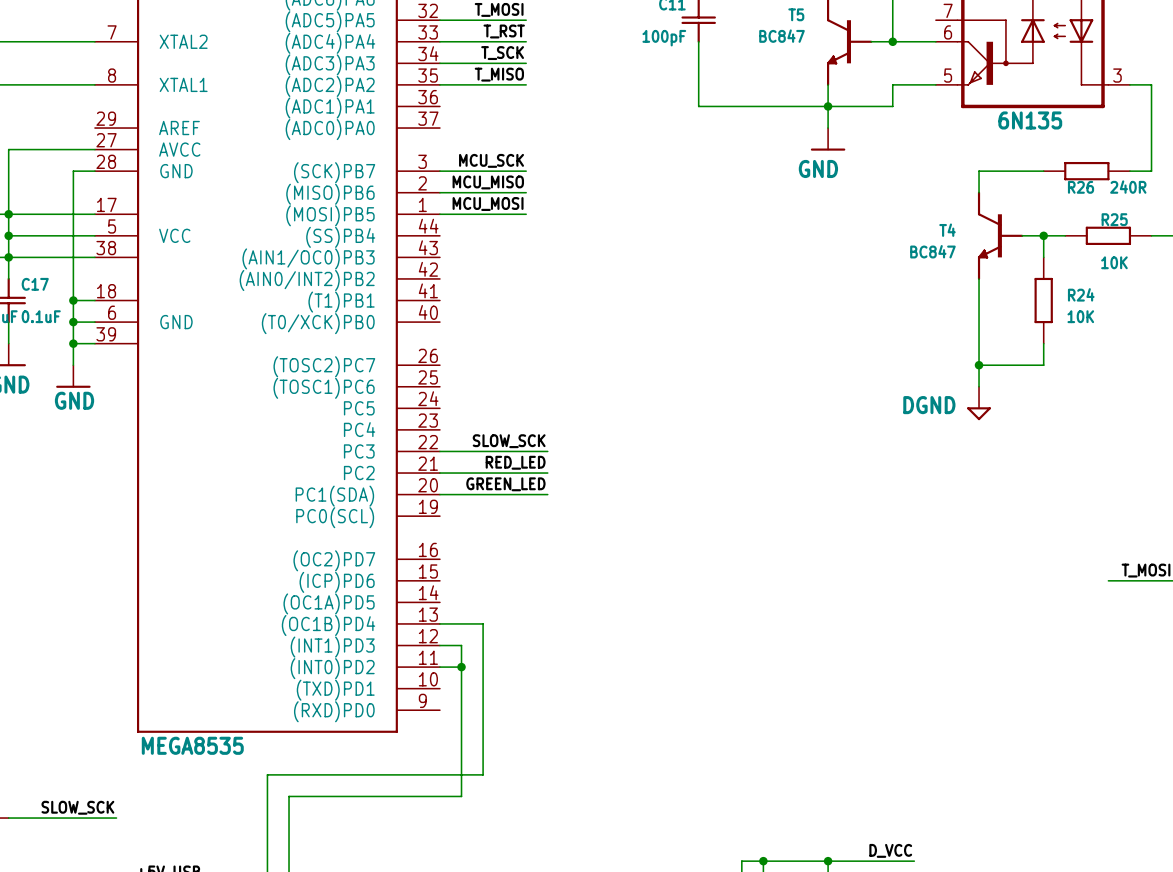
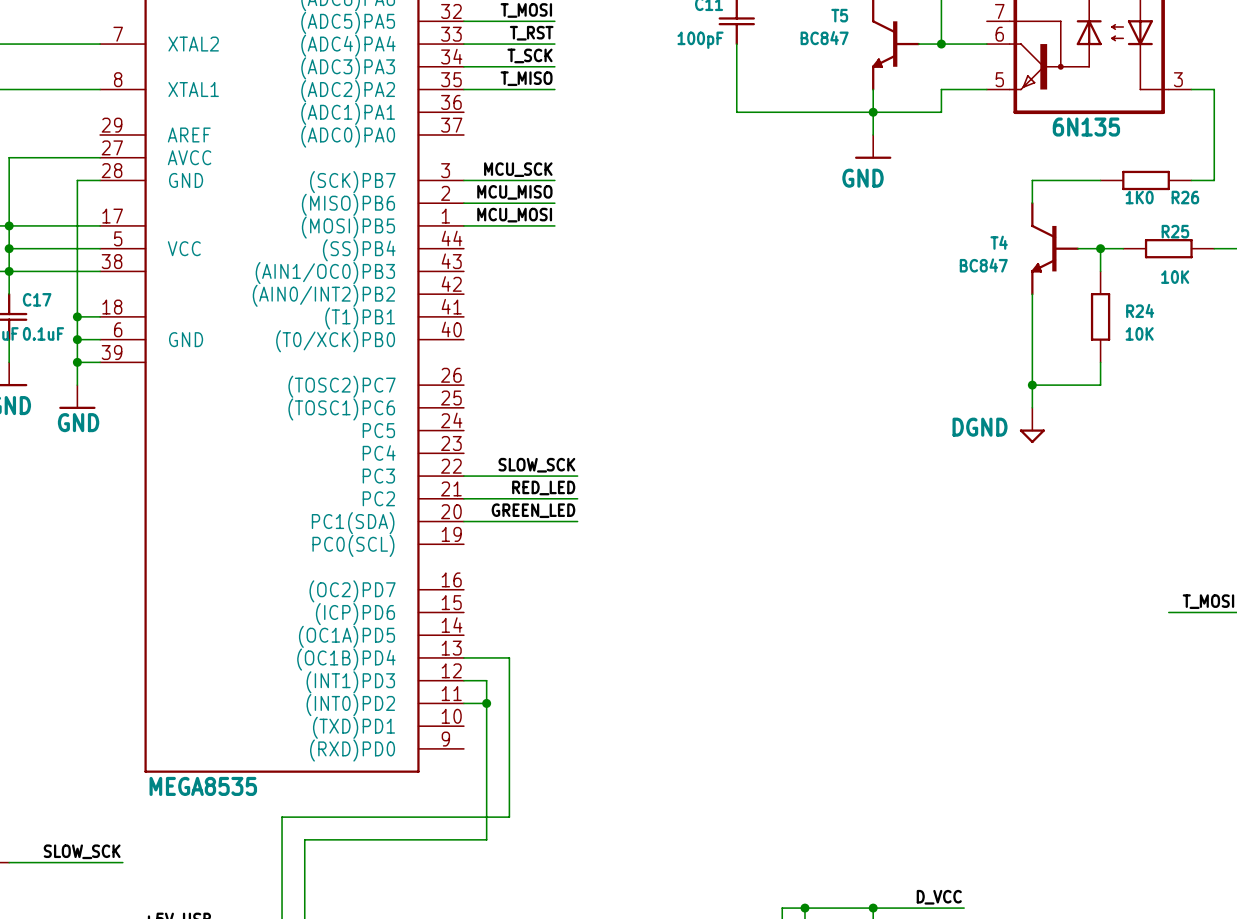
R26 name position: R26 (1081, 187) -> R26 (1185, 197)
R26 value: 240R (1128, 187) -> 1K0 (1139, 197)

